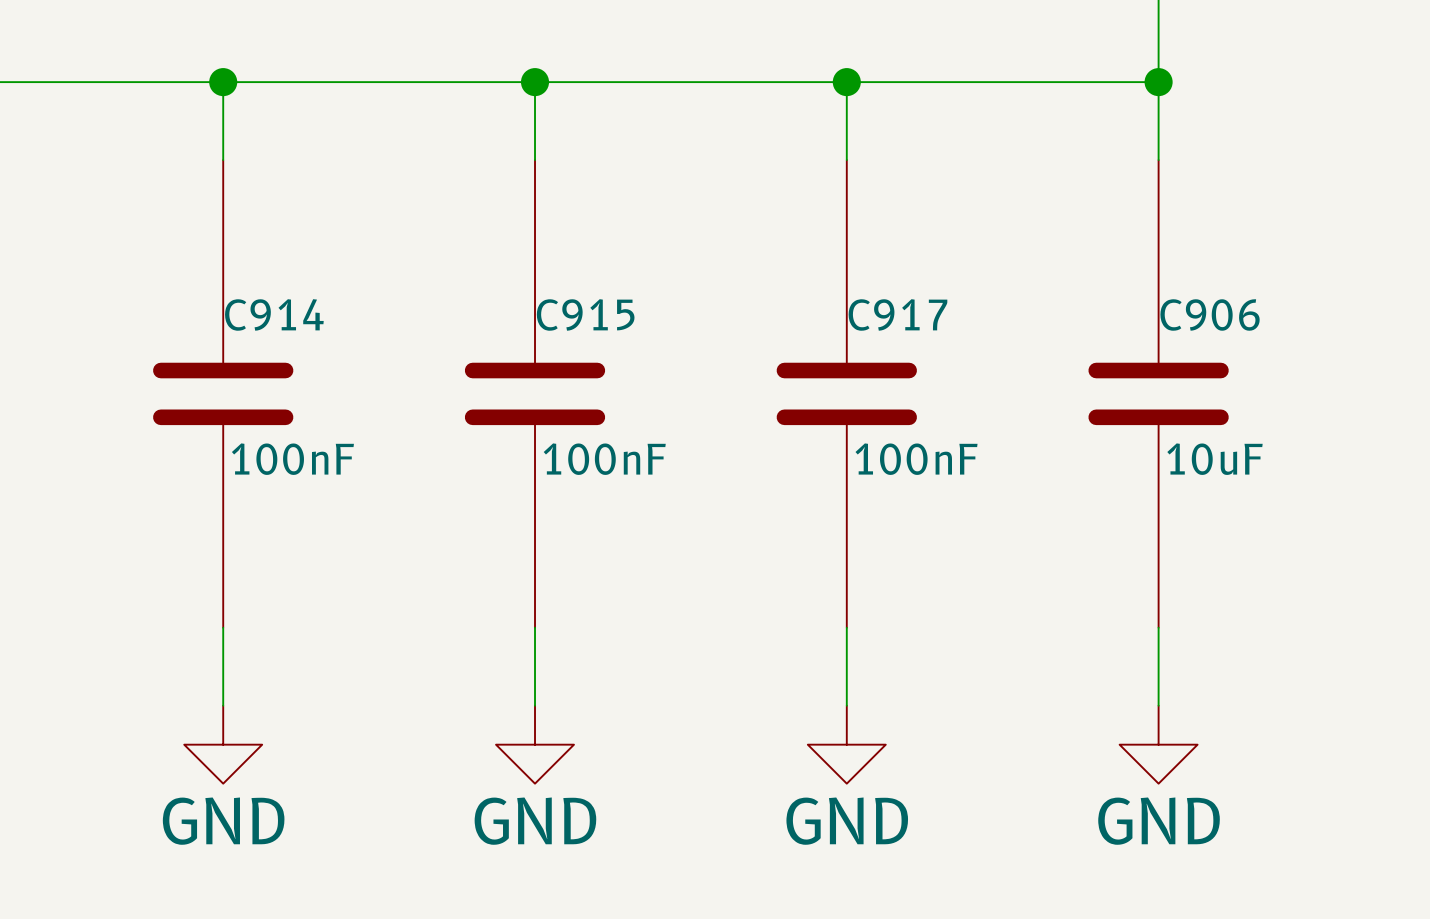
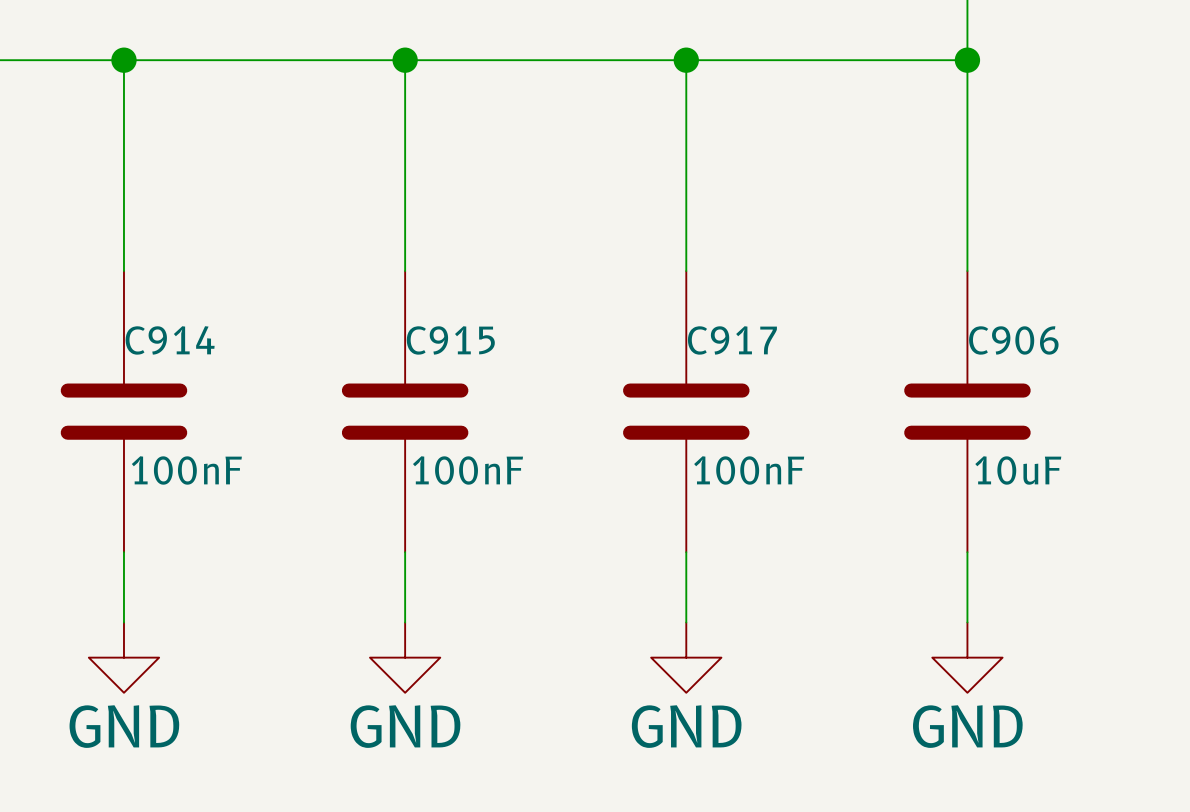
C914 symbol: [153, 160, 294, 628] -> [60, 271, 188, 553]
C915 symbol: [464, 160, 606, 628] -> [341, 271, 469, 553]
C917 symbol: [776, 160, 917, 628] -> [623, 271, 750, 553]
C906 symbol: [1088, 160, 1229, 628] -> [904, 271, 1031, 553]

